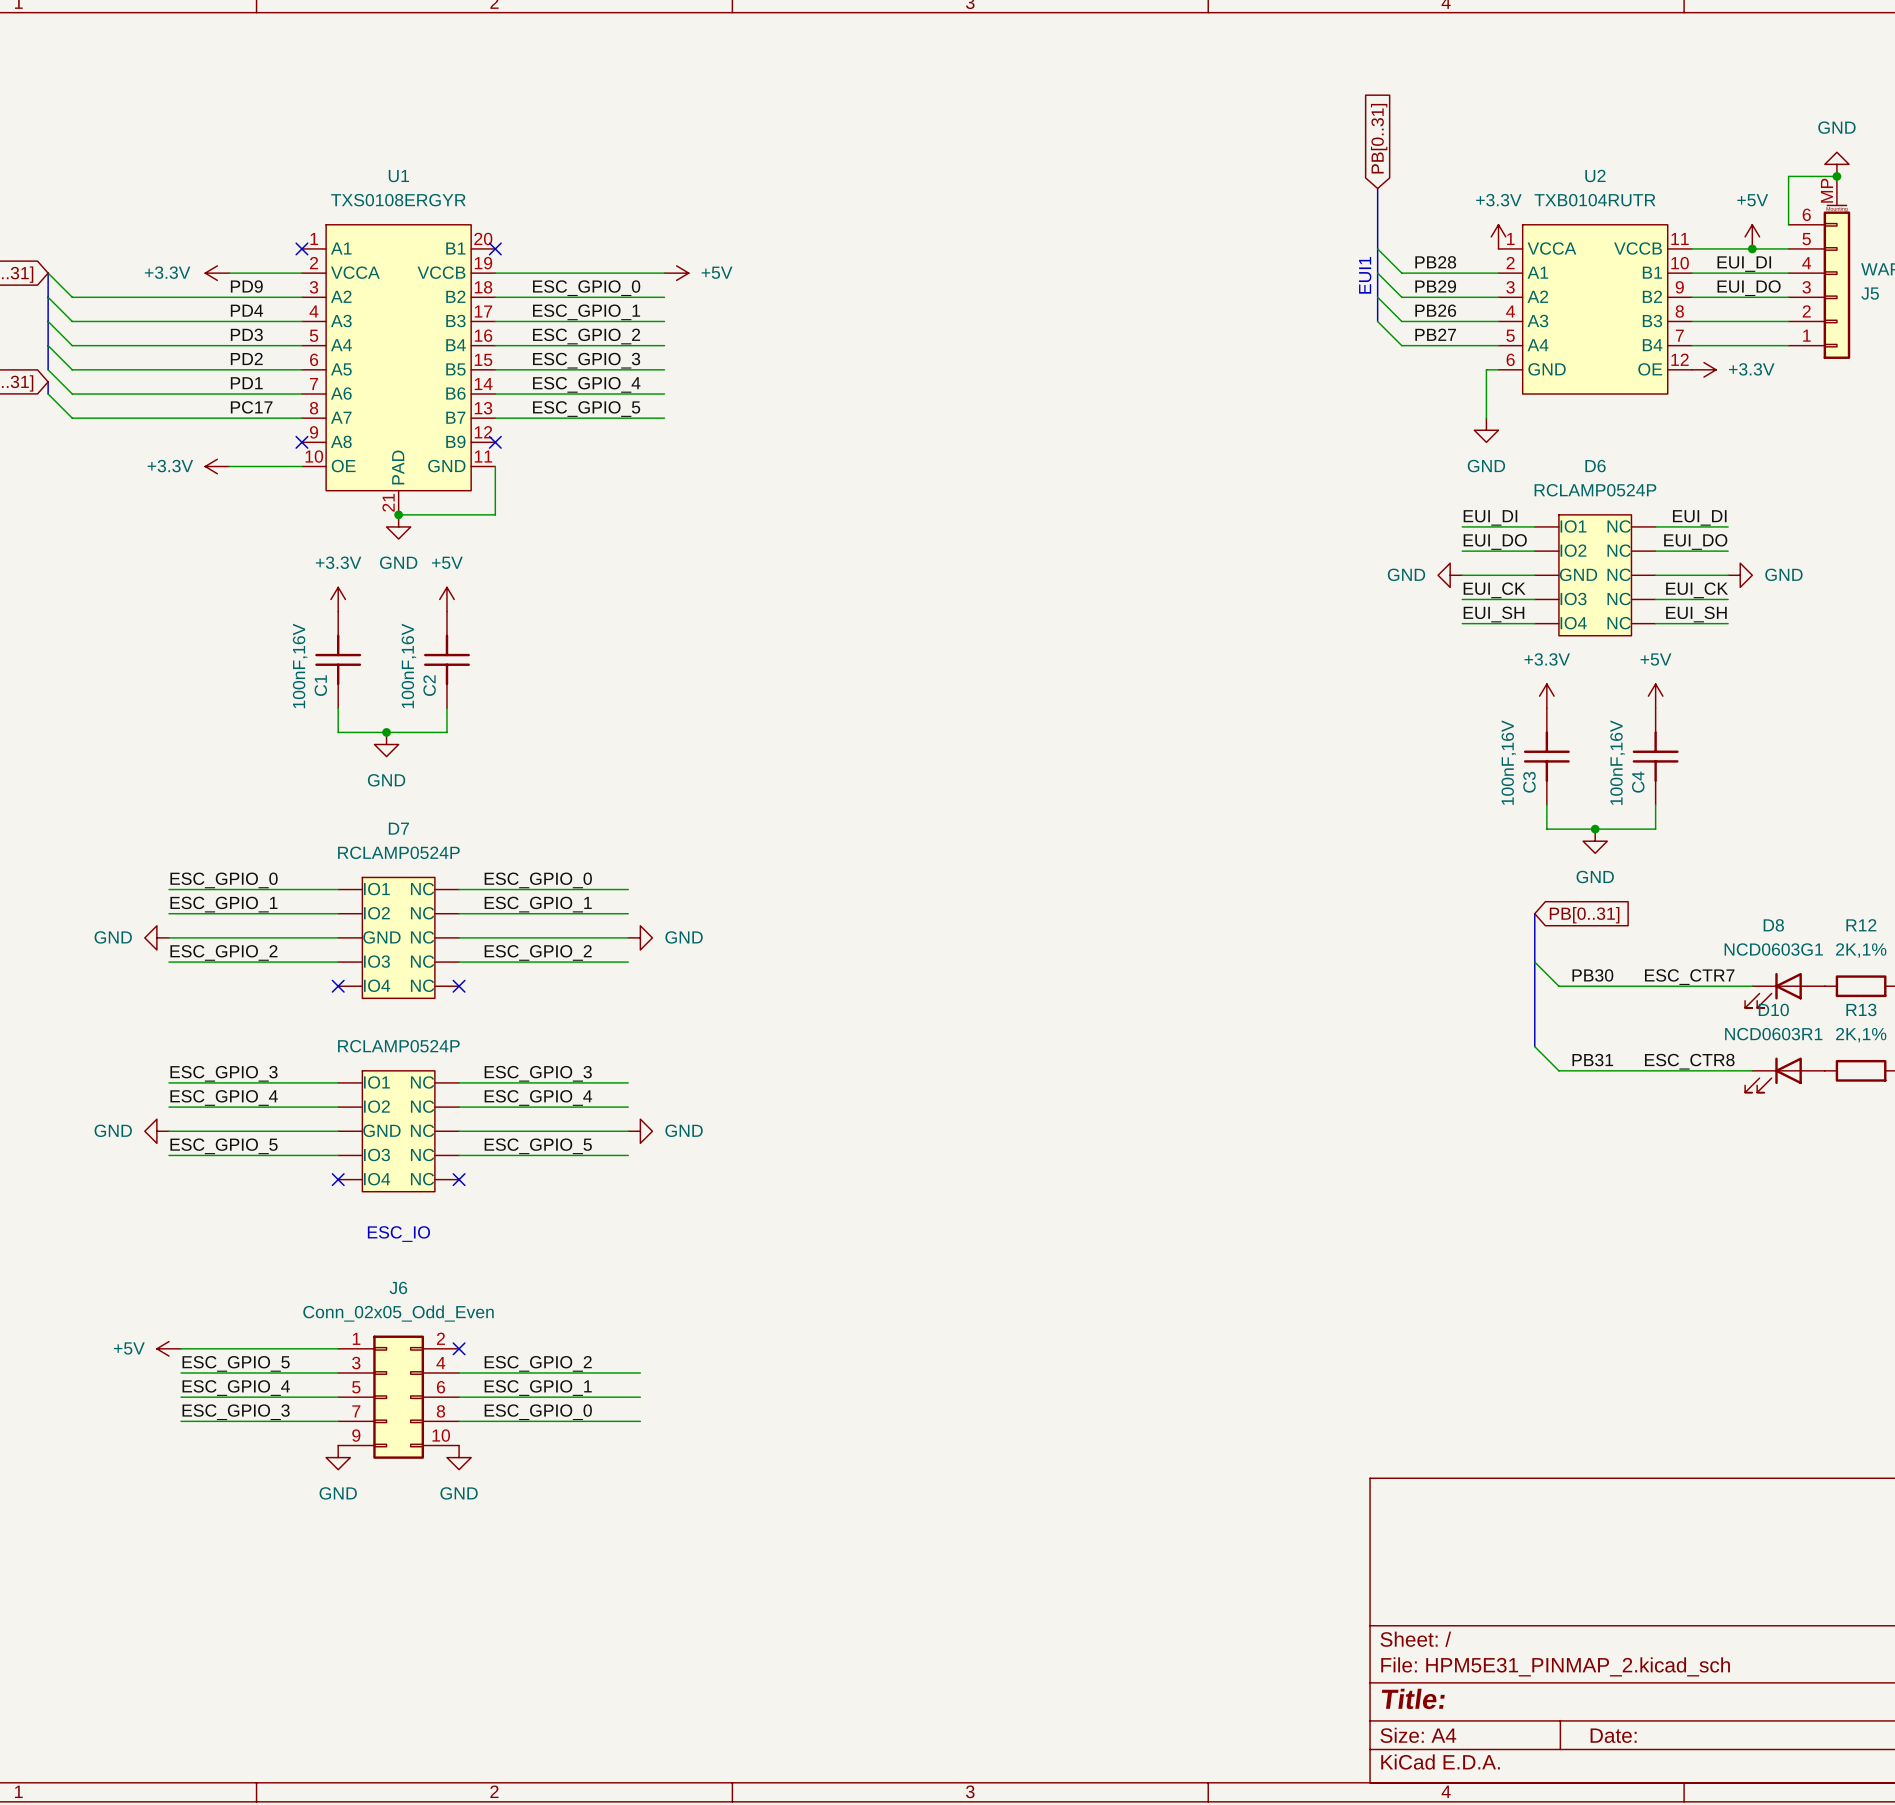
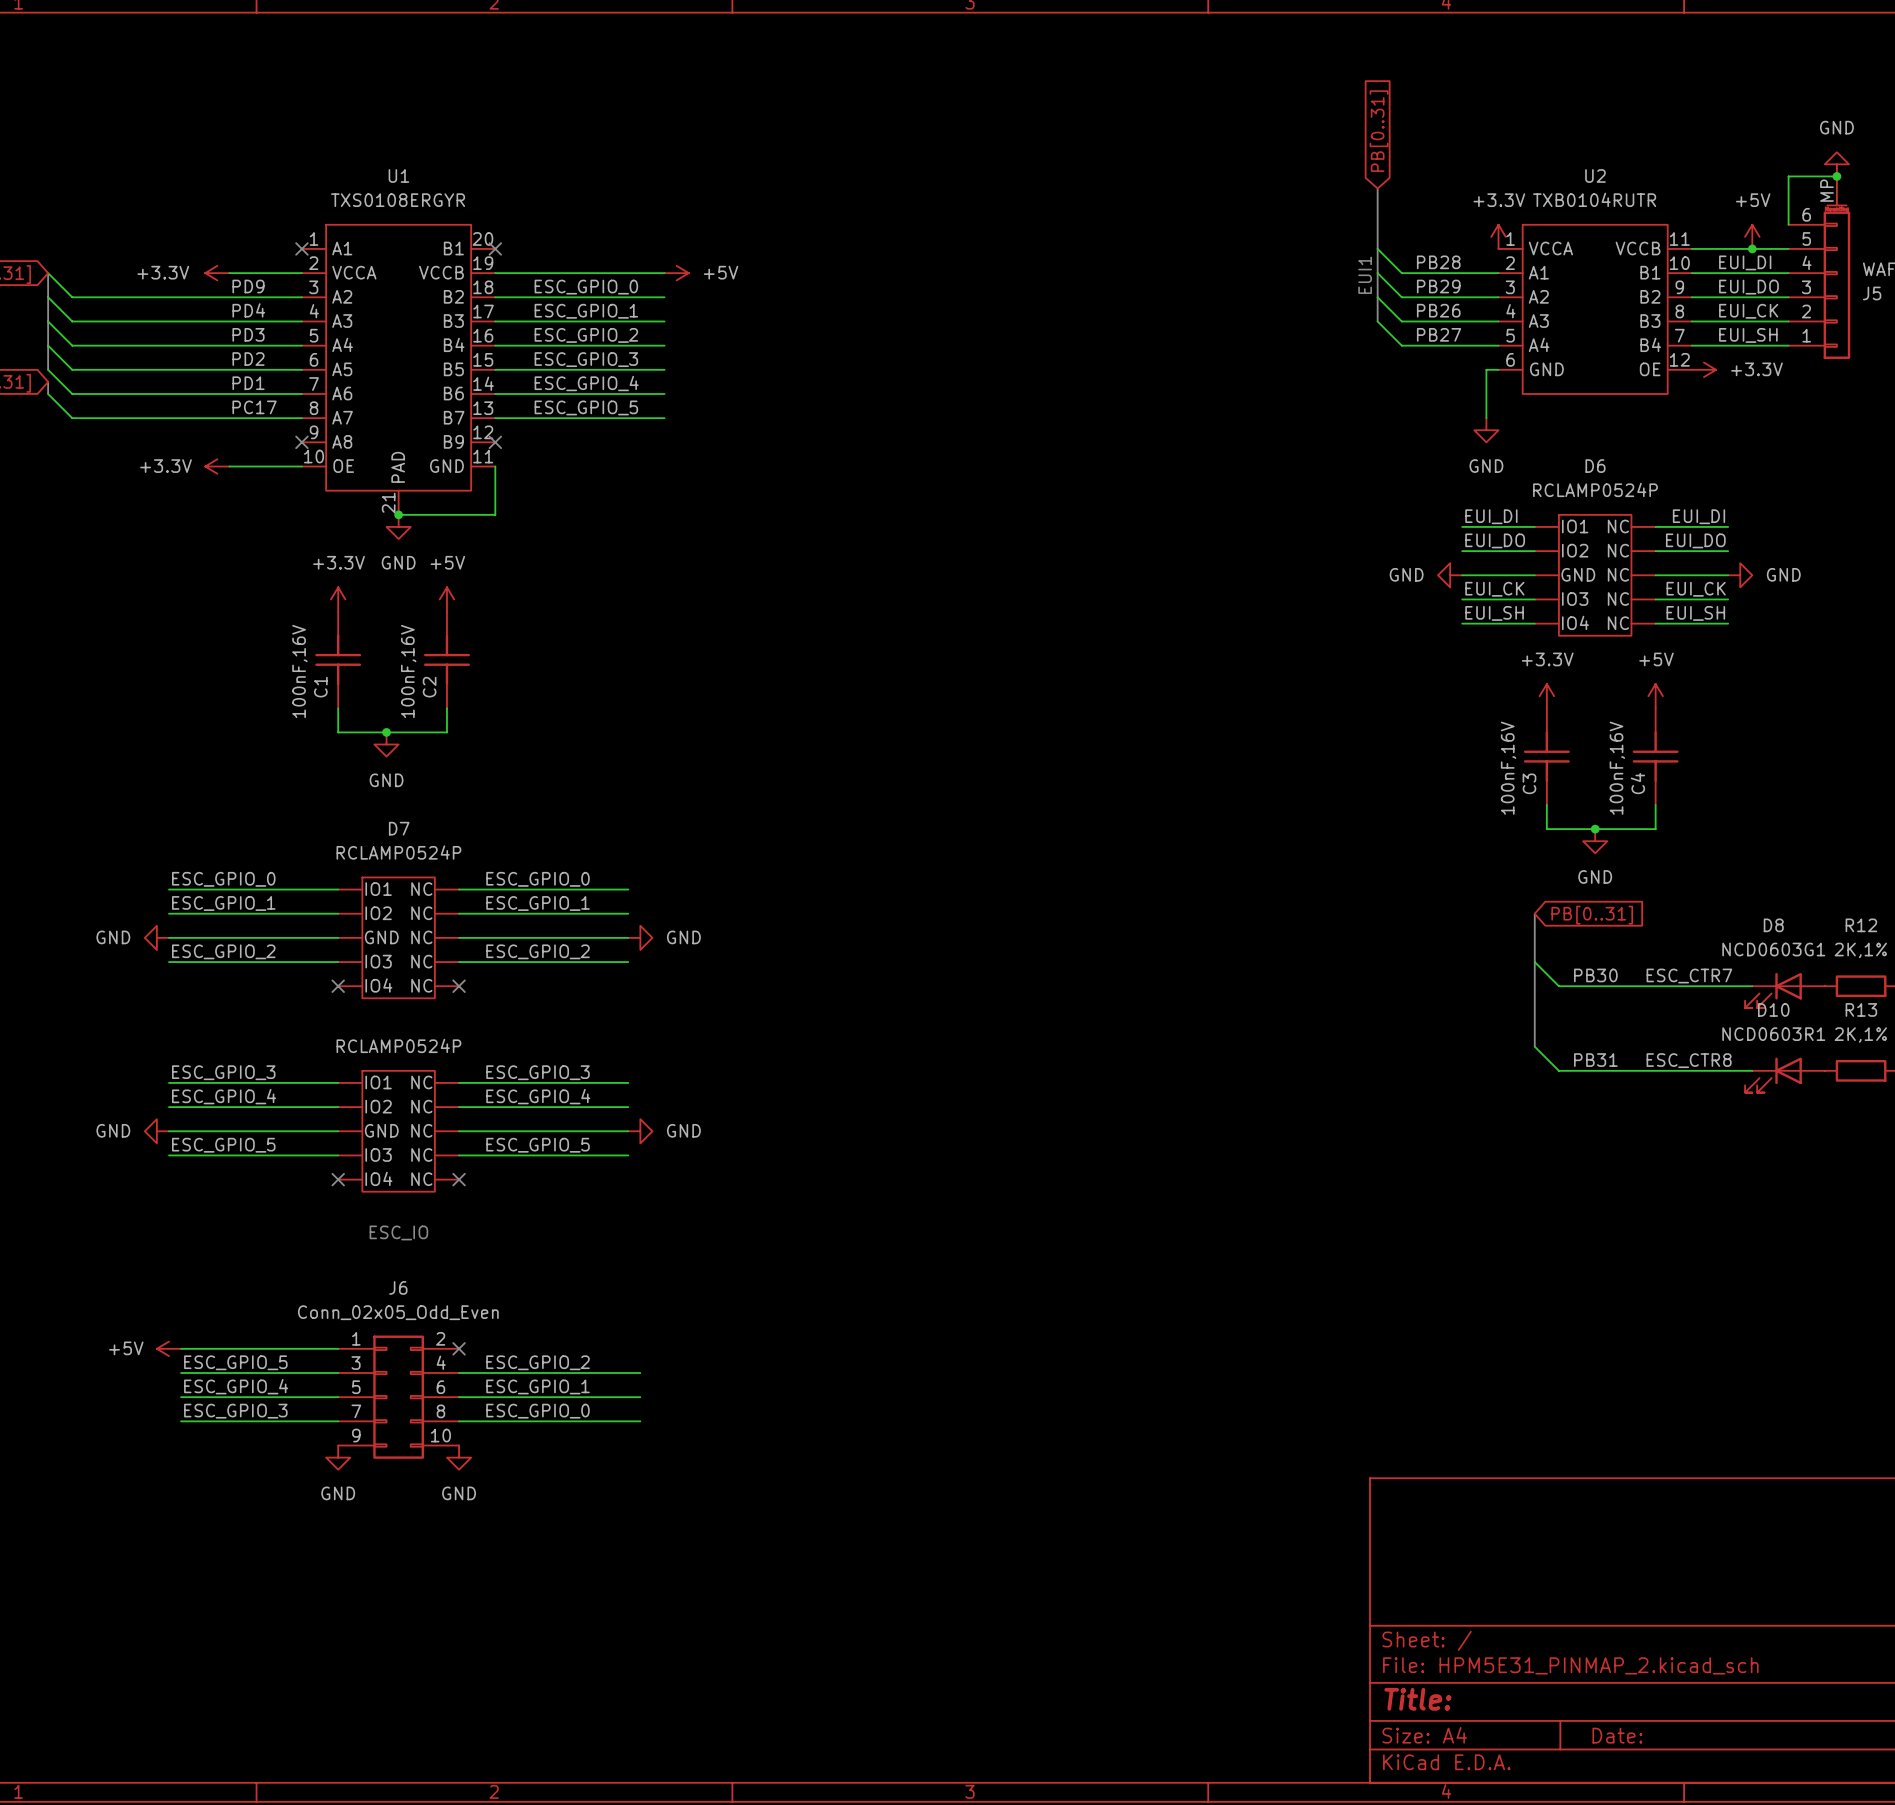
label: none -> EUI_CK (1748, 311)
label: none -> EUI_SH (1748, 335)

